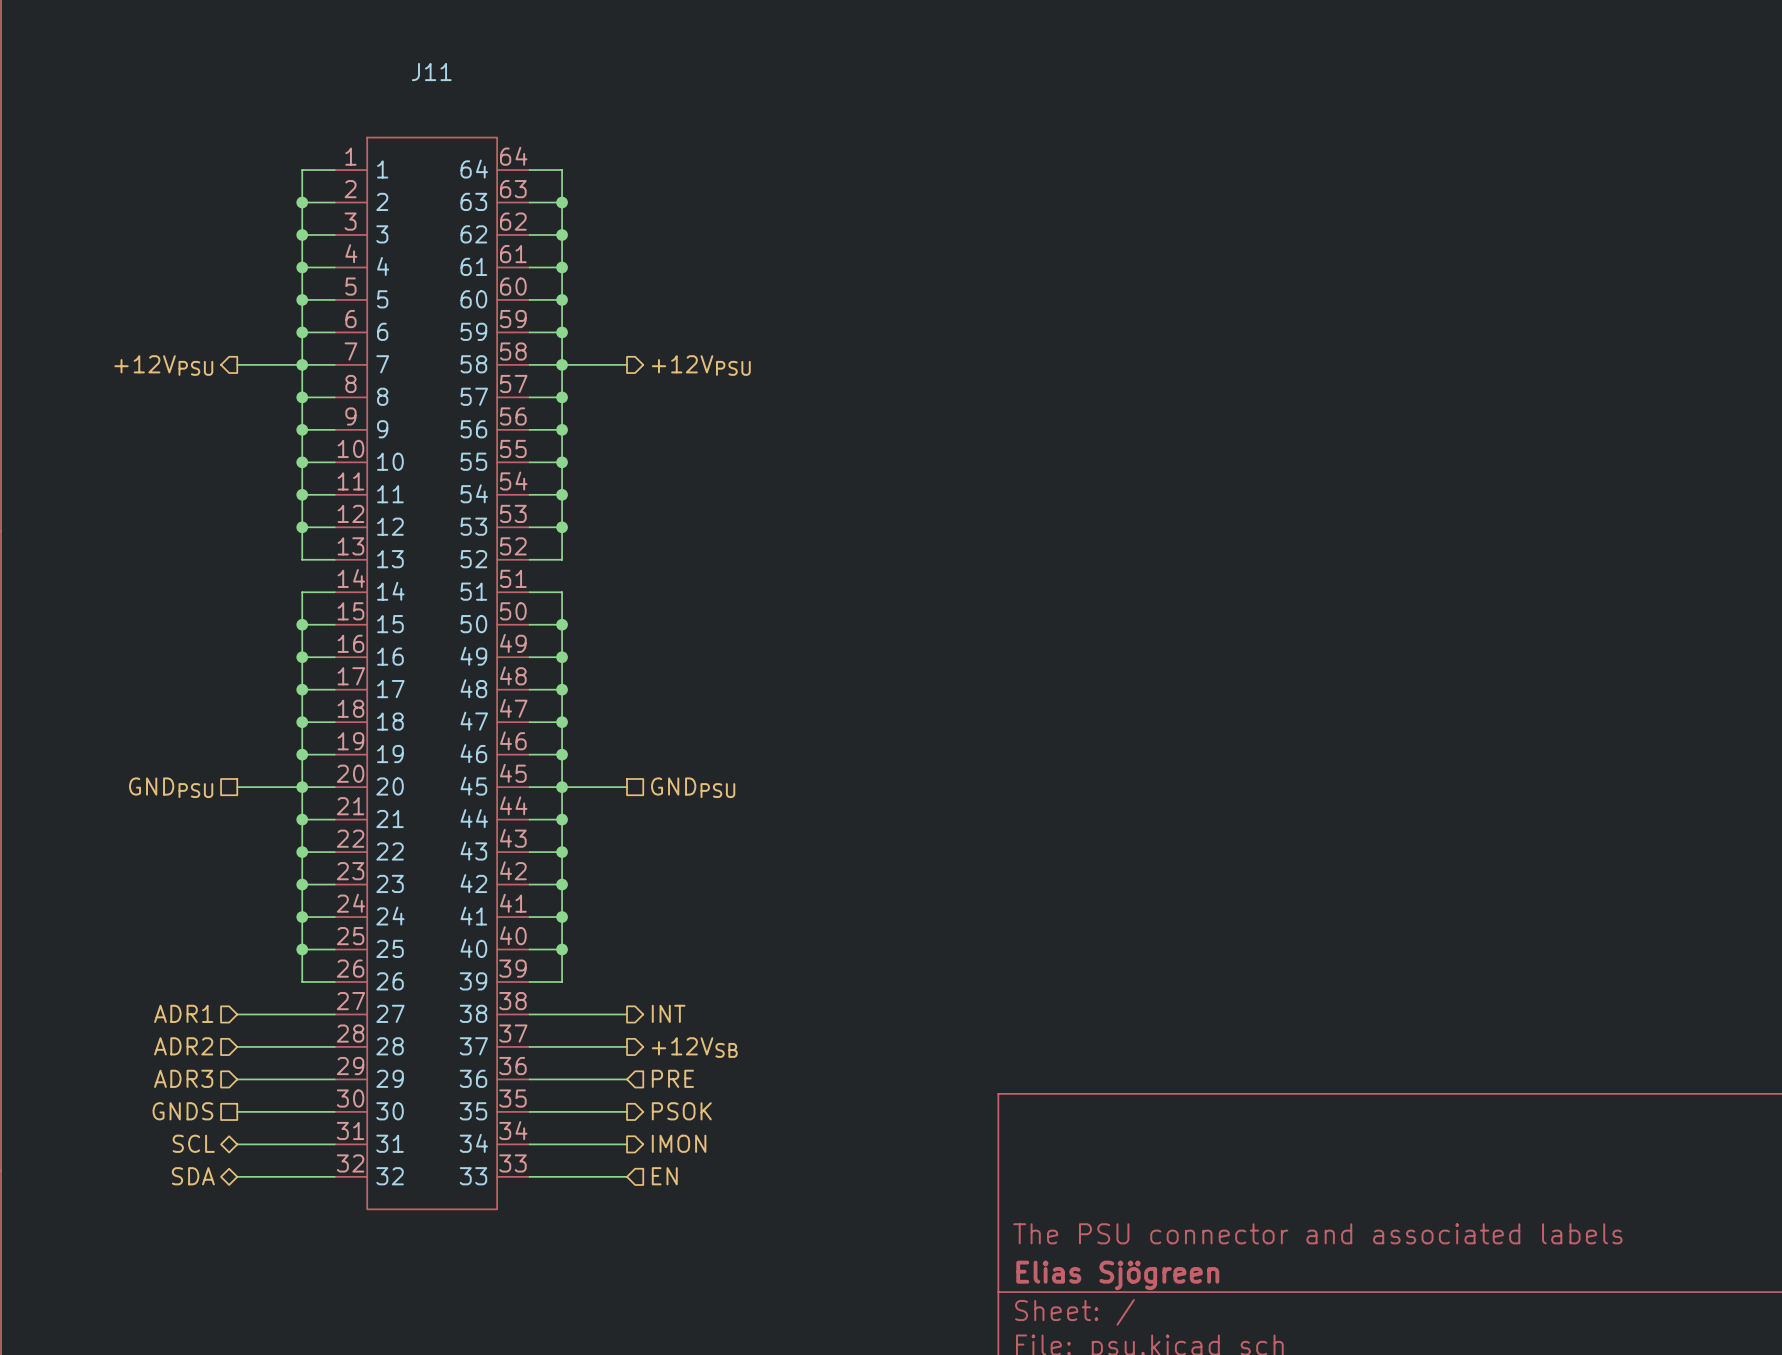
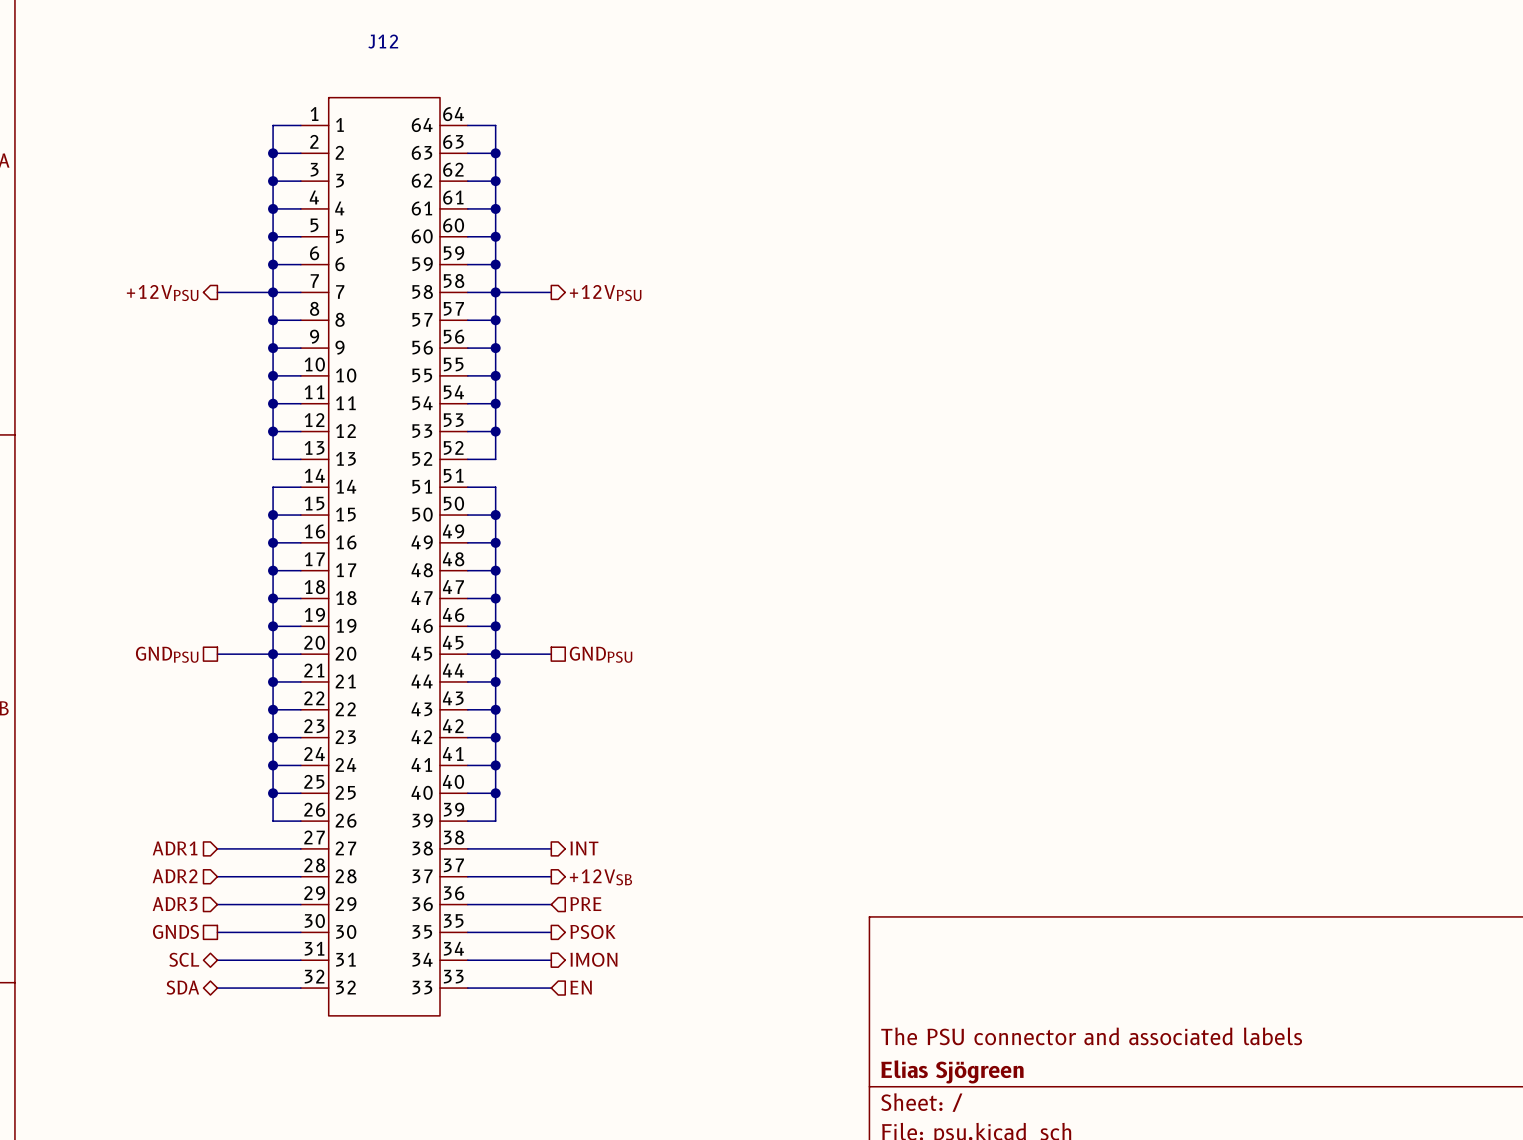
J11 name: J11 (431, 72) -> J12 (383, 41)

